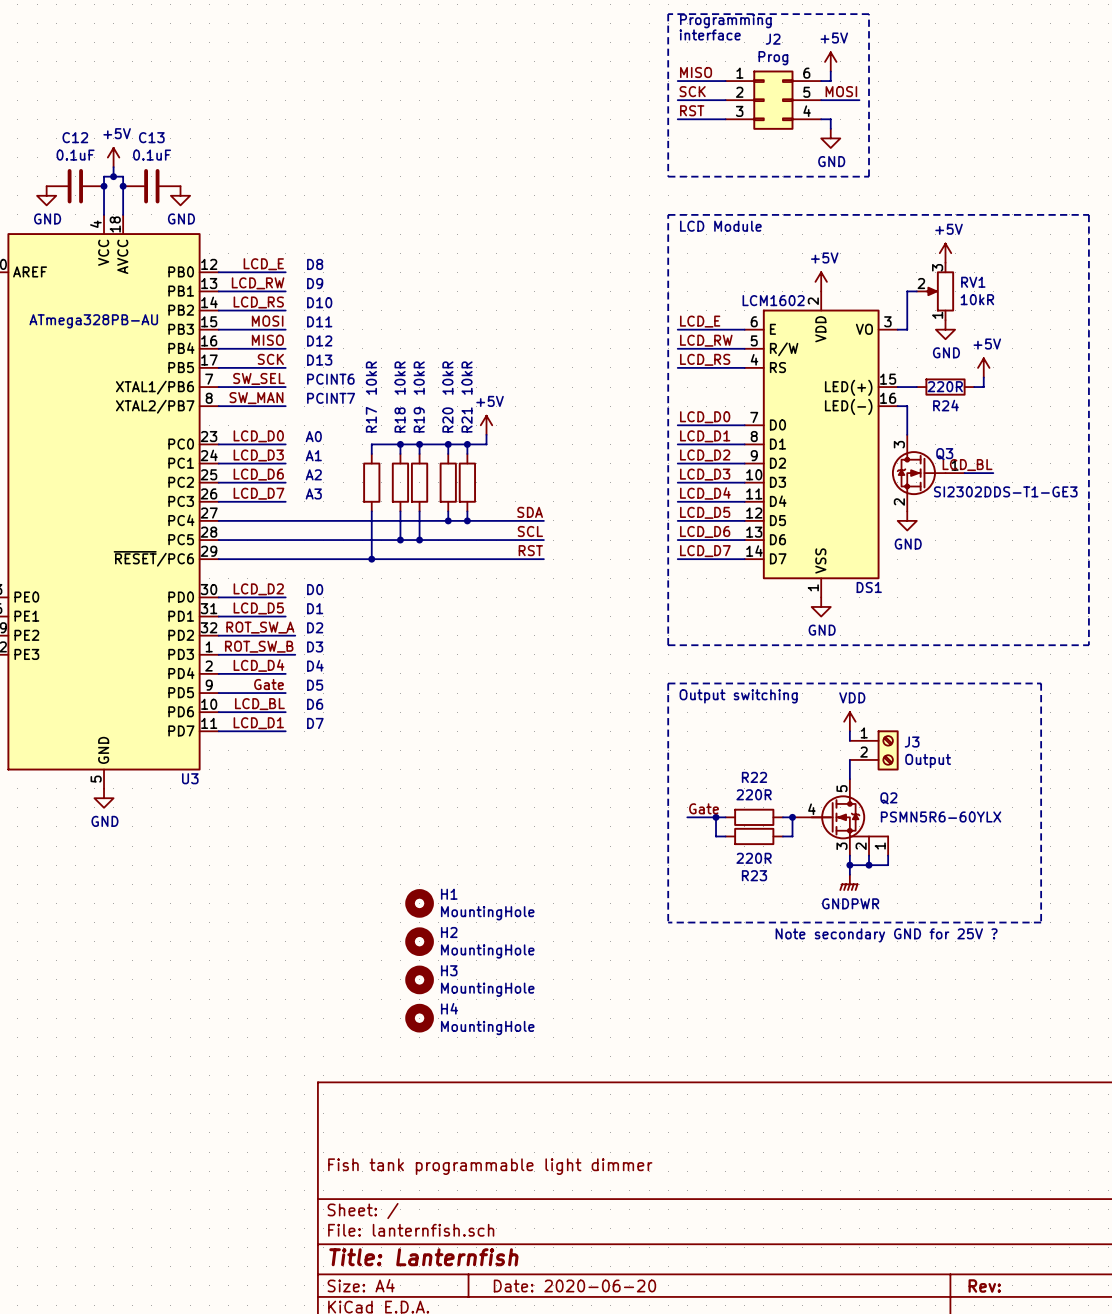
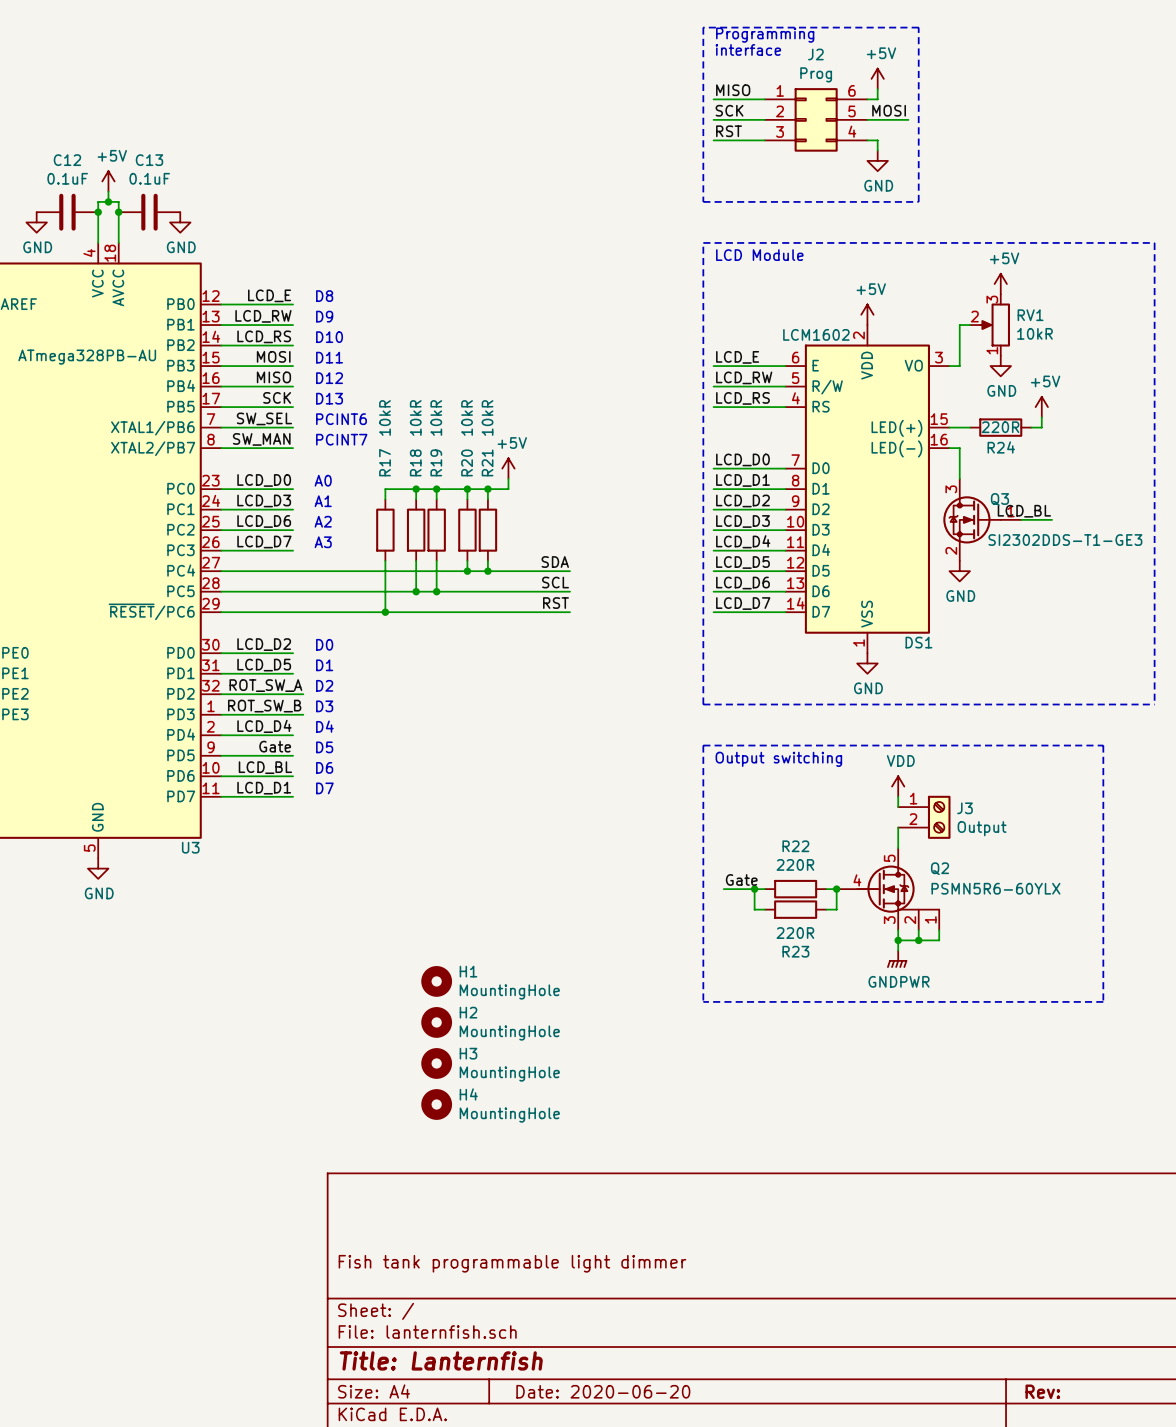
text: Note secondary GND for 25V ? (886, 935) -> none

